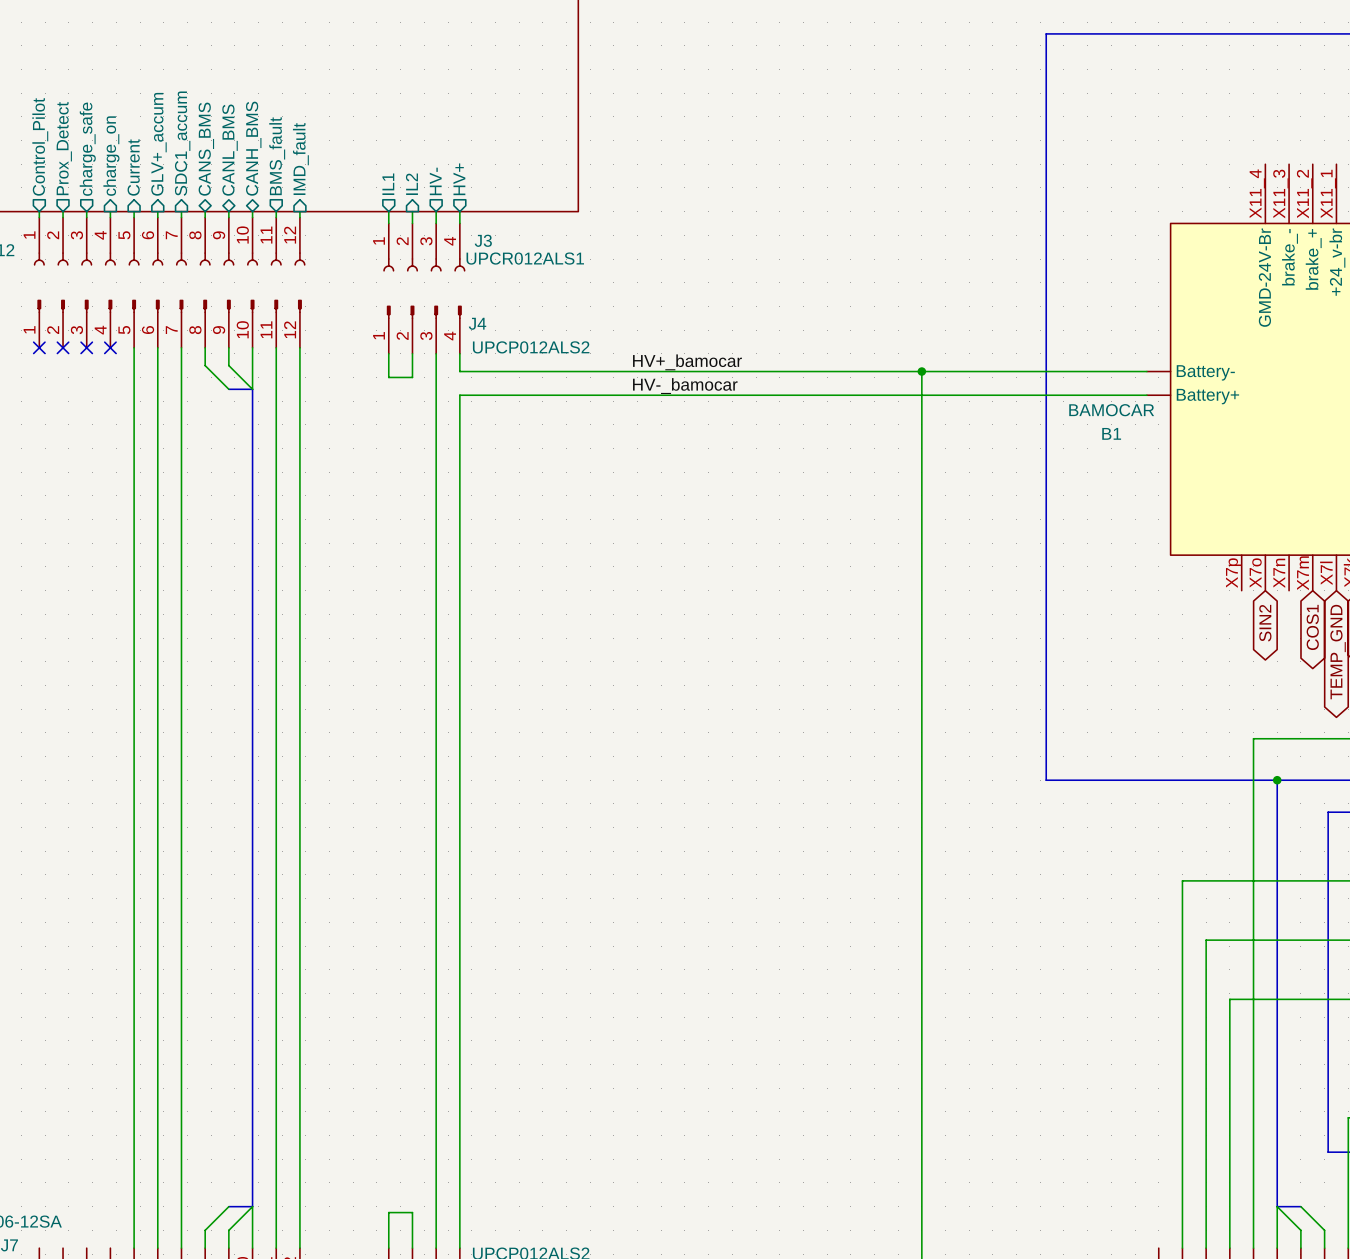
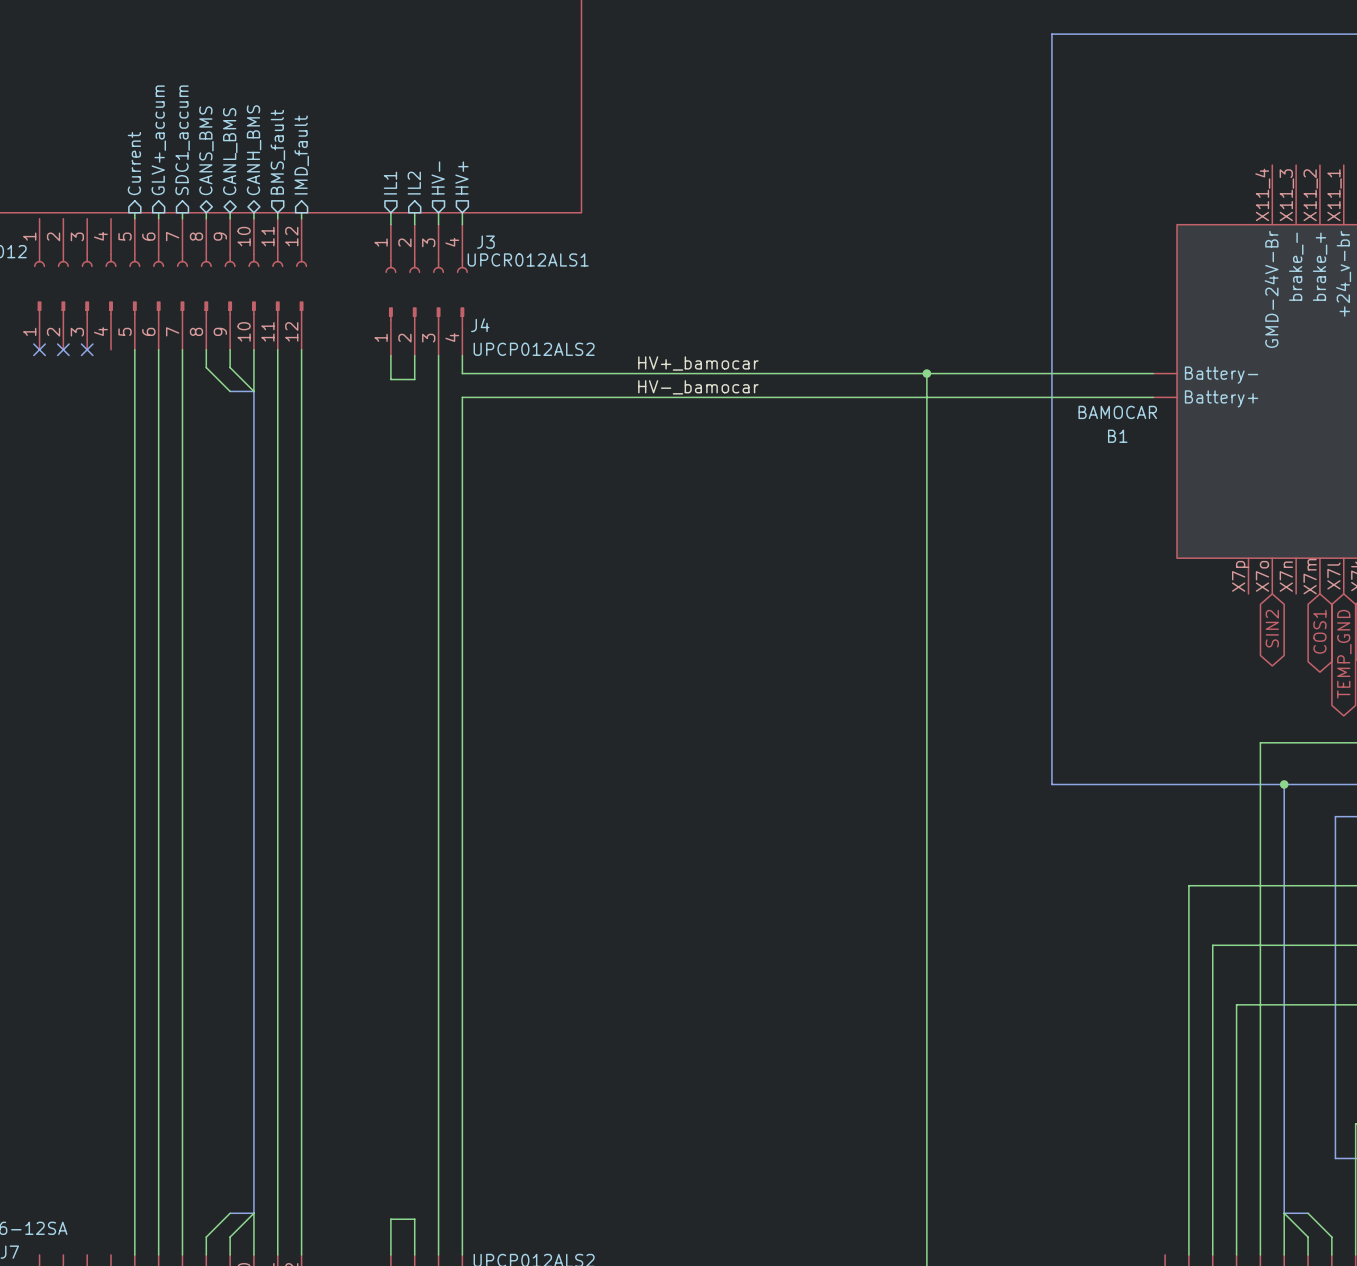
sheet pin: Control_Pilot (40, 146) -> none
sheet pin: Prox_Detect (64, 148) -> none
sheet pin: charge_safe (87, 149) -> none
sheet pin: charge_on (111, 156) -> none
wire: (39, 211) (39, 217) -> none
wire: (63, 211) (63, 217) -> none
wire: (86, 211) (86, 217) -> none
wire: (110, 211) (110, 217) -> none
no-connect mark: (110, 347) -> none

